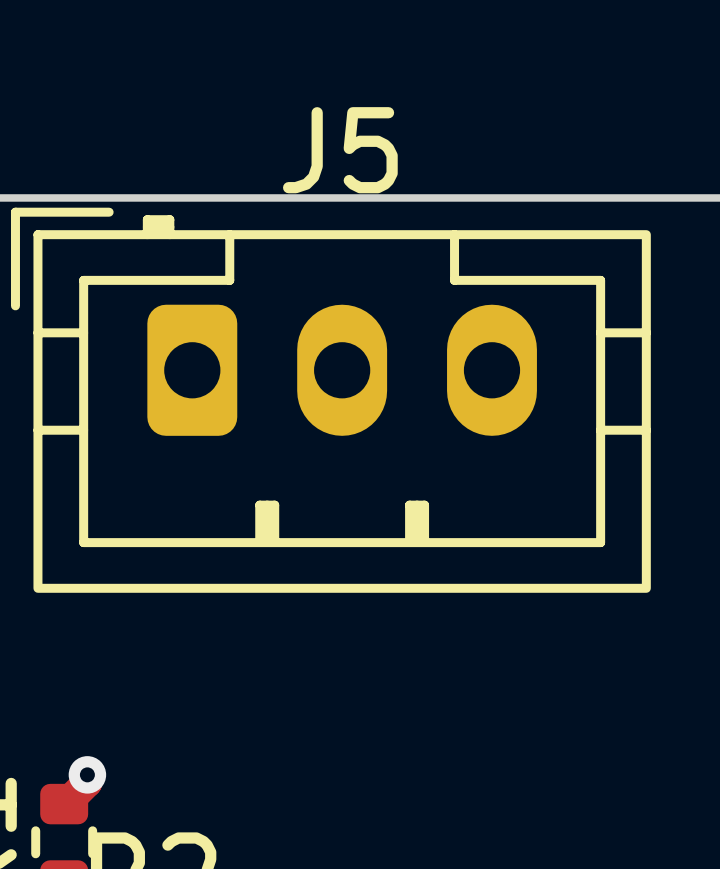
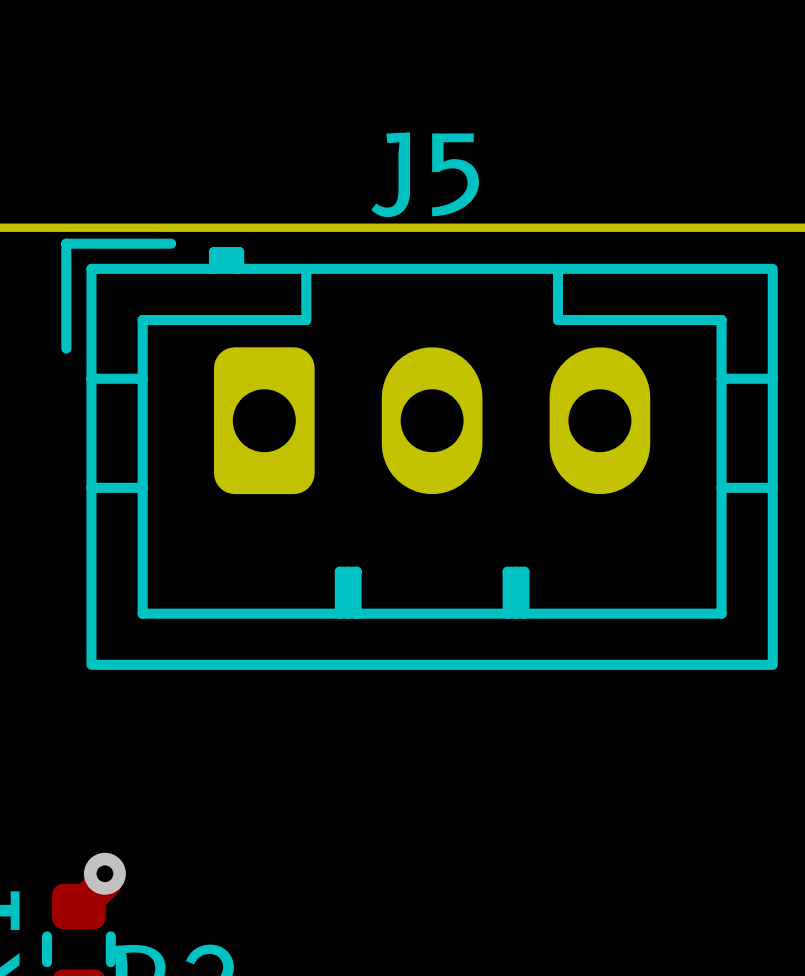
J5 position: (330, 400) -> (419, 454)

